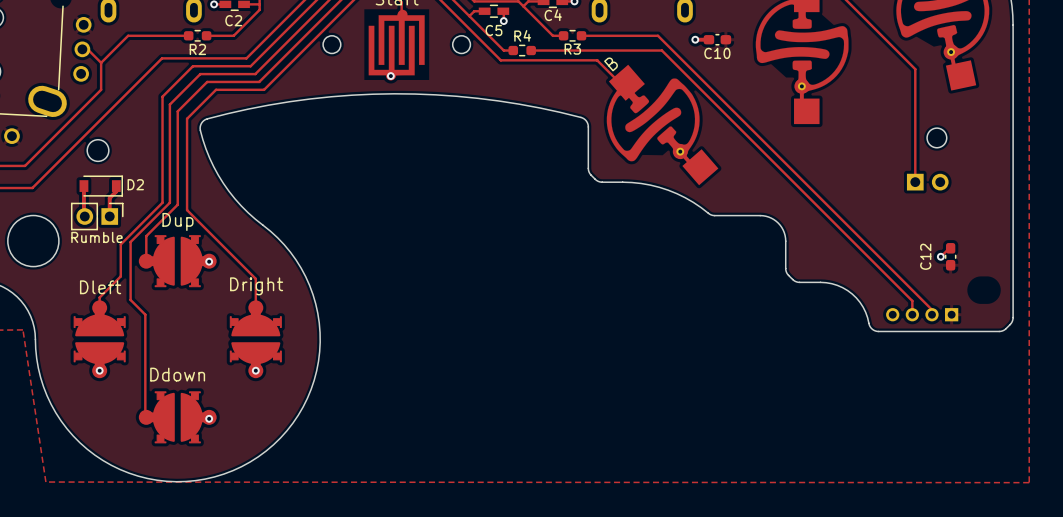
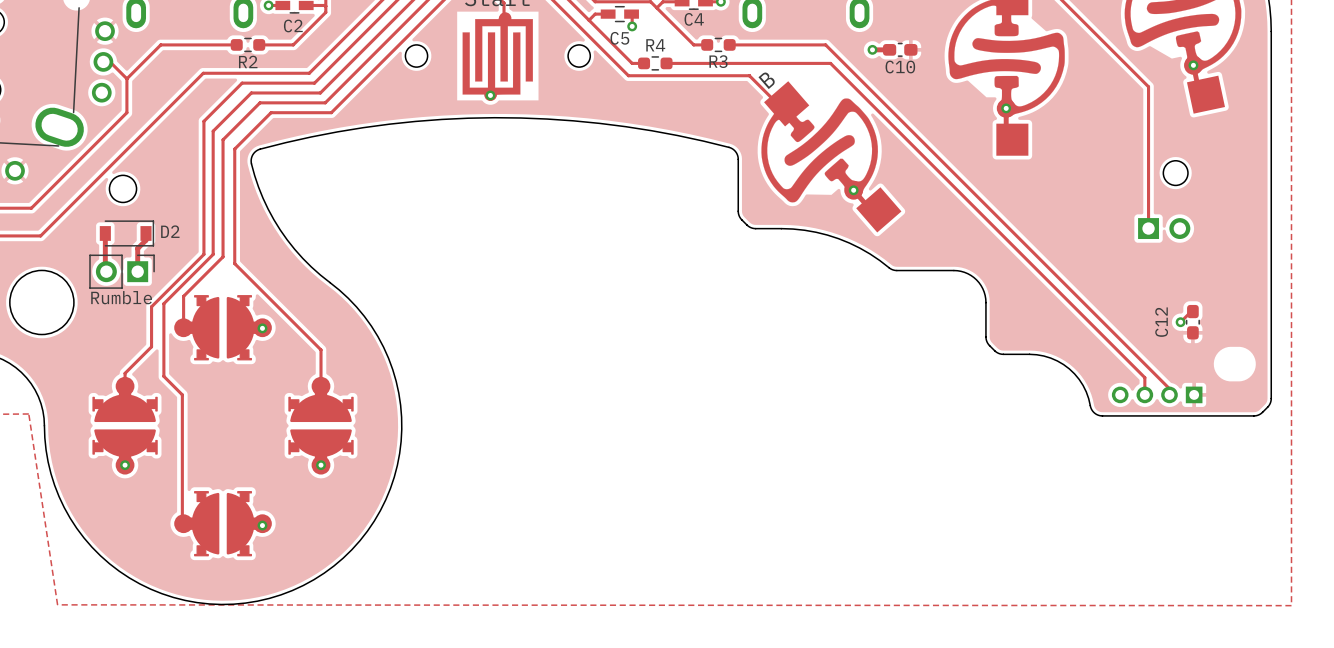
part value: Dup (177, 221) -> none
part value: Dright (256, 286) -> none
part value: Dleft (100, 287) -> none
part value: Ddown (177, 374) -> none

